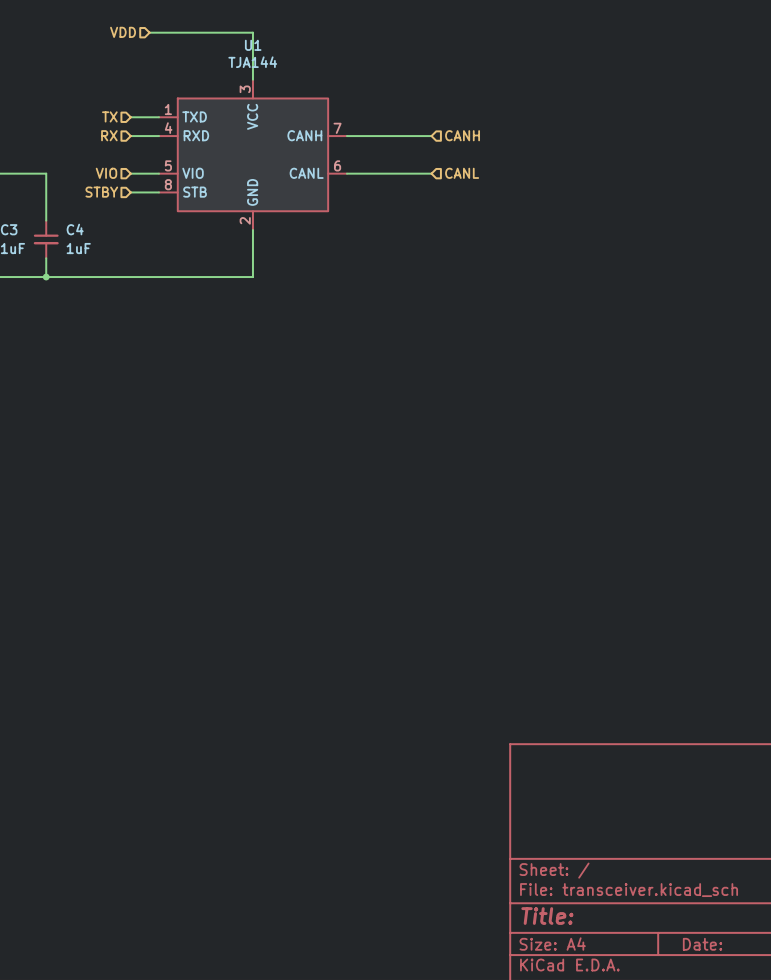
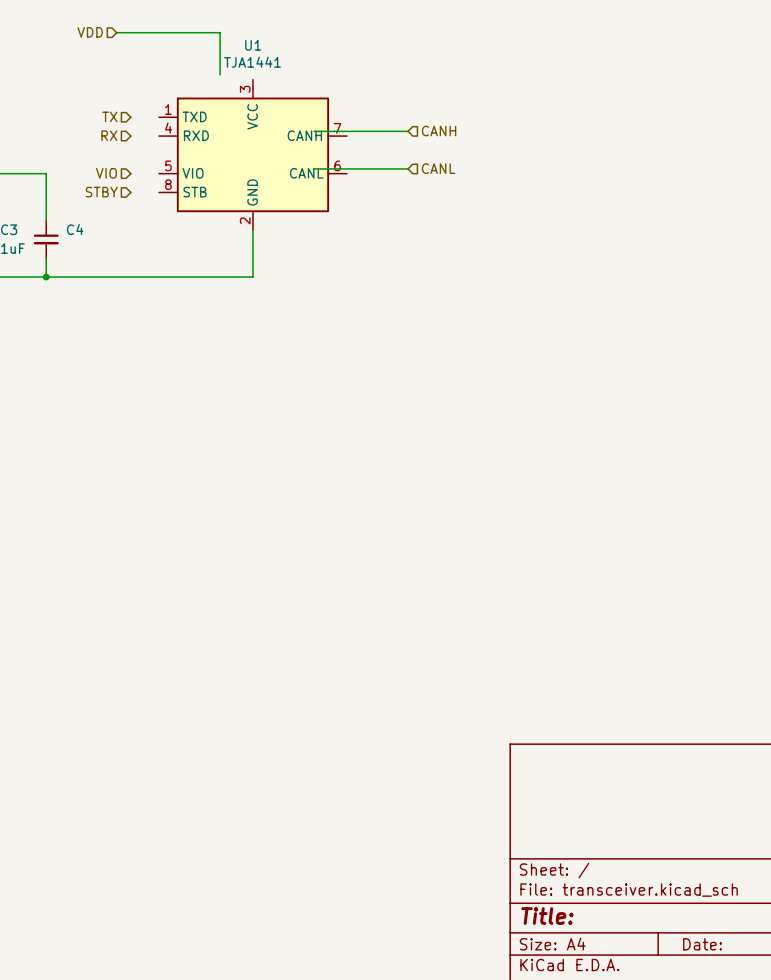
wire: none -> (116, 32) (149, 32)
hierarchical label position: VDD (123, 32) -> VDD (90, 32)
wire: (220, 32) (252, 32) (252, 79) -> (220, 32) (220, 74)
U1 value: TJA144 (252, 62) -> TJA1441 (252, 62)
wire: (130, 117) (159, 117) -> none
wire: none -> (314, 131) (408, 131)
hierarchical label position: CANH (462, 135) -> CANH (439, 131)
wire: (130, 136) (159, 136) -> none
wire: (346, 136) (431, 136) -> none
wire: none -> (314, 168) (408, 168)
wire: (130, 173) (159, 173) -> none
wire: (346, 173) (431, 173) -> none
hierarchical label position: CANL (462, 173) -> CANL (438, 168)
wire: (130, 192) (159, 192) -> none
C4 value: 1uF (78, 248) -> none

